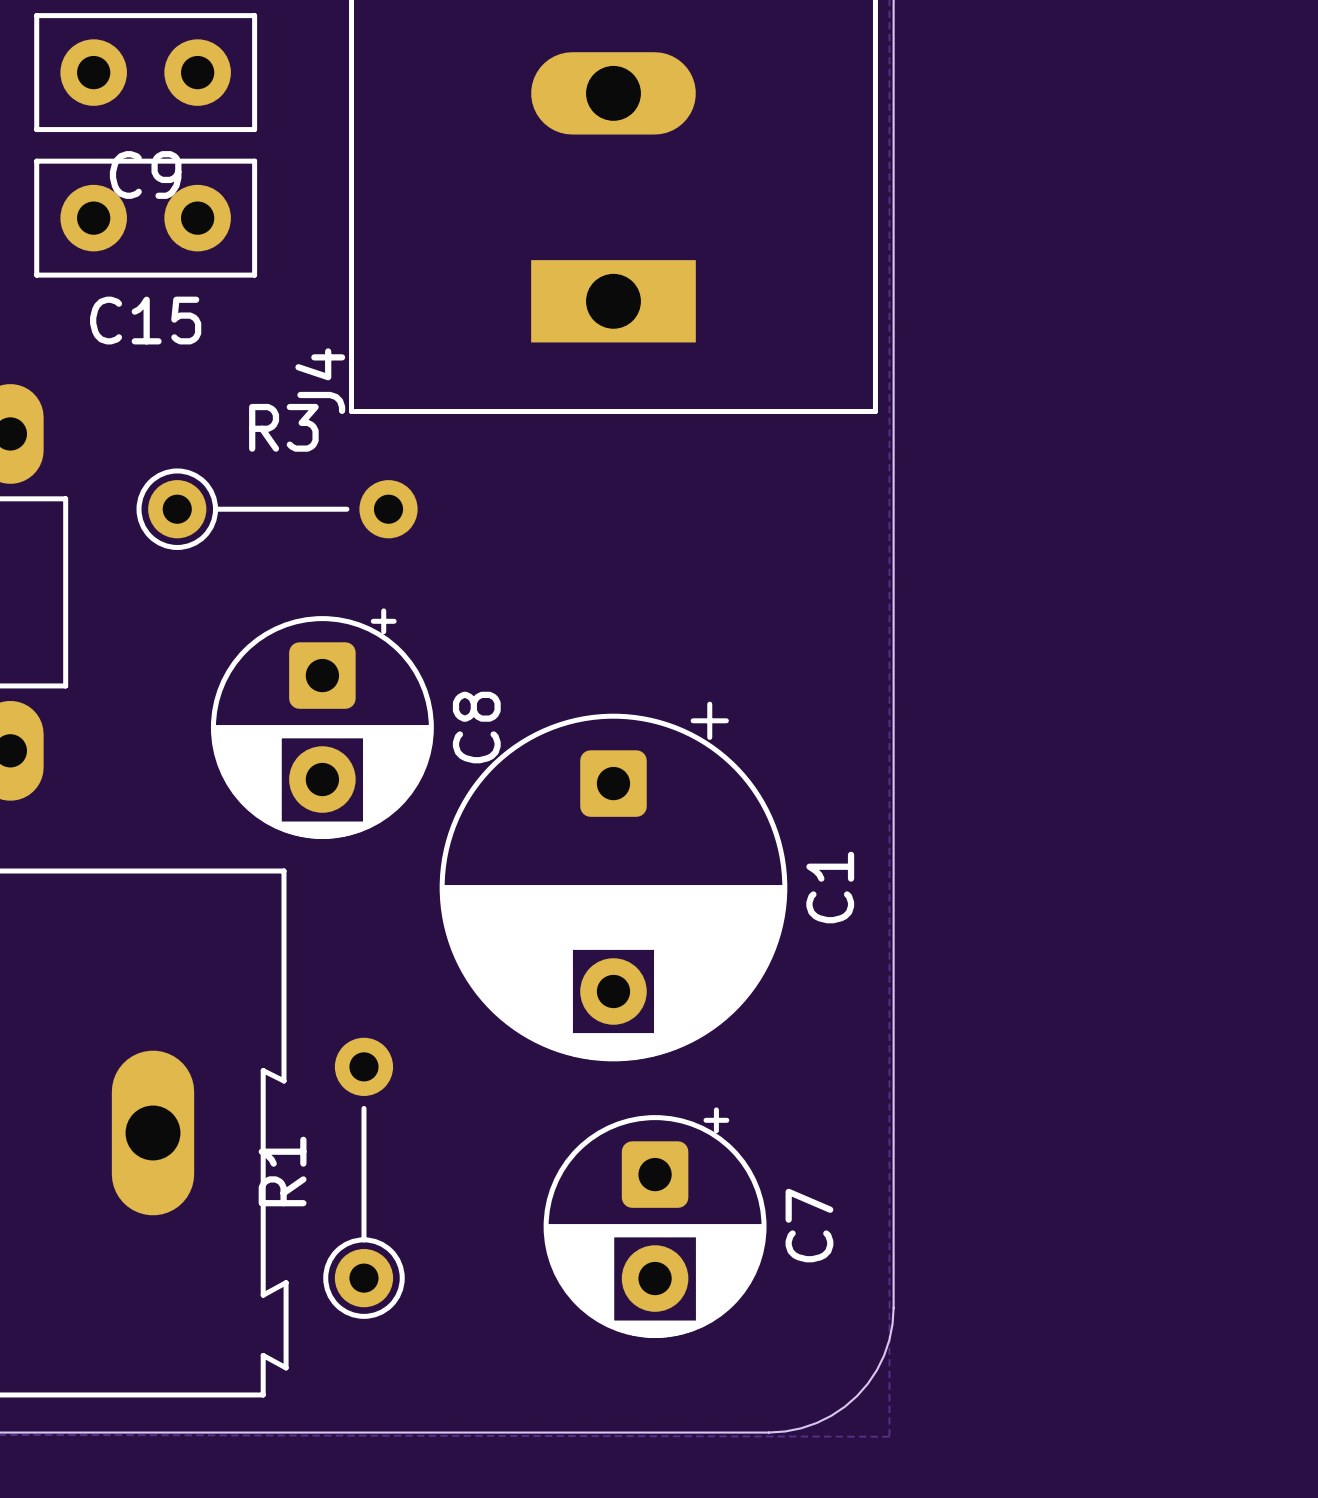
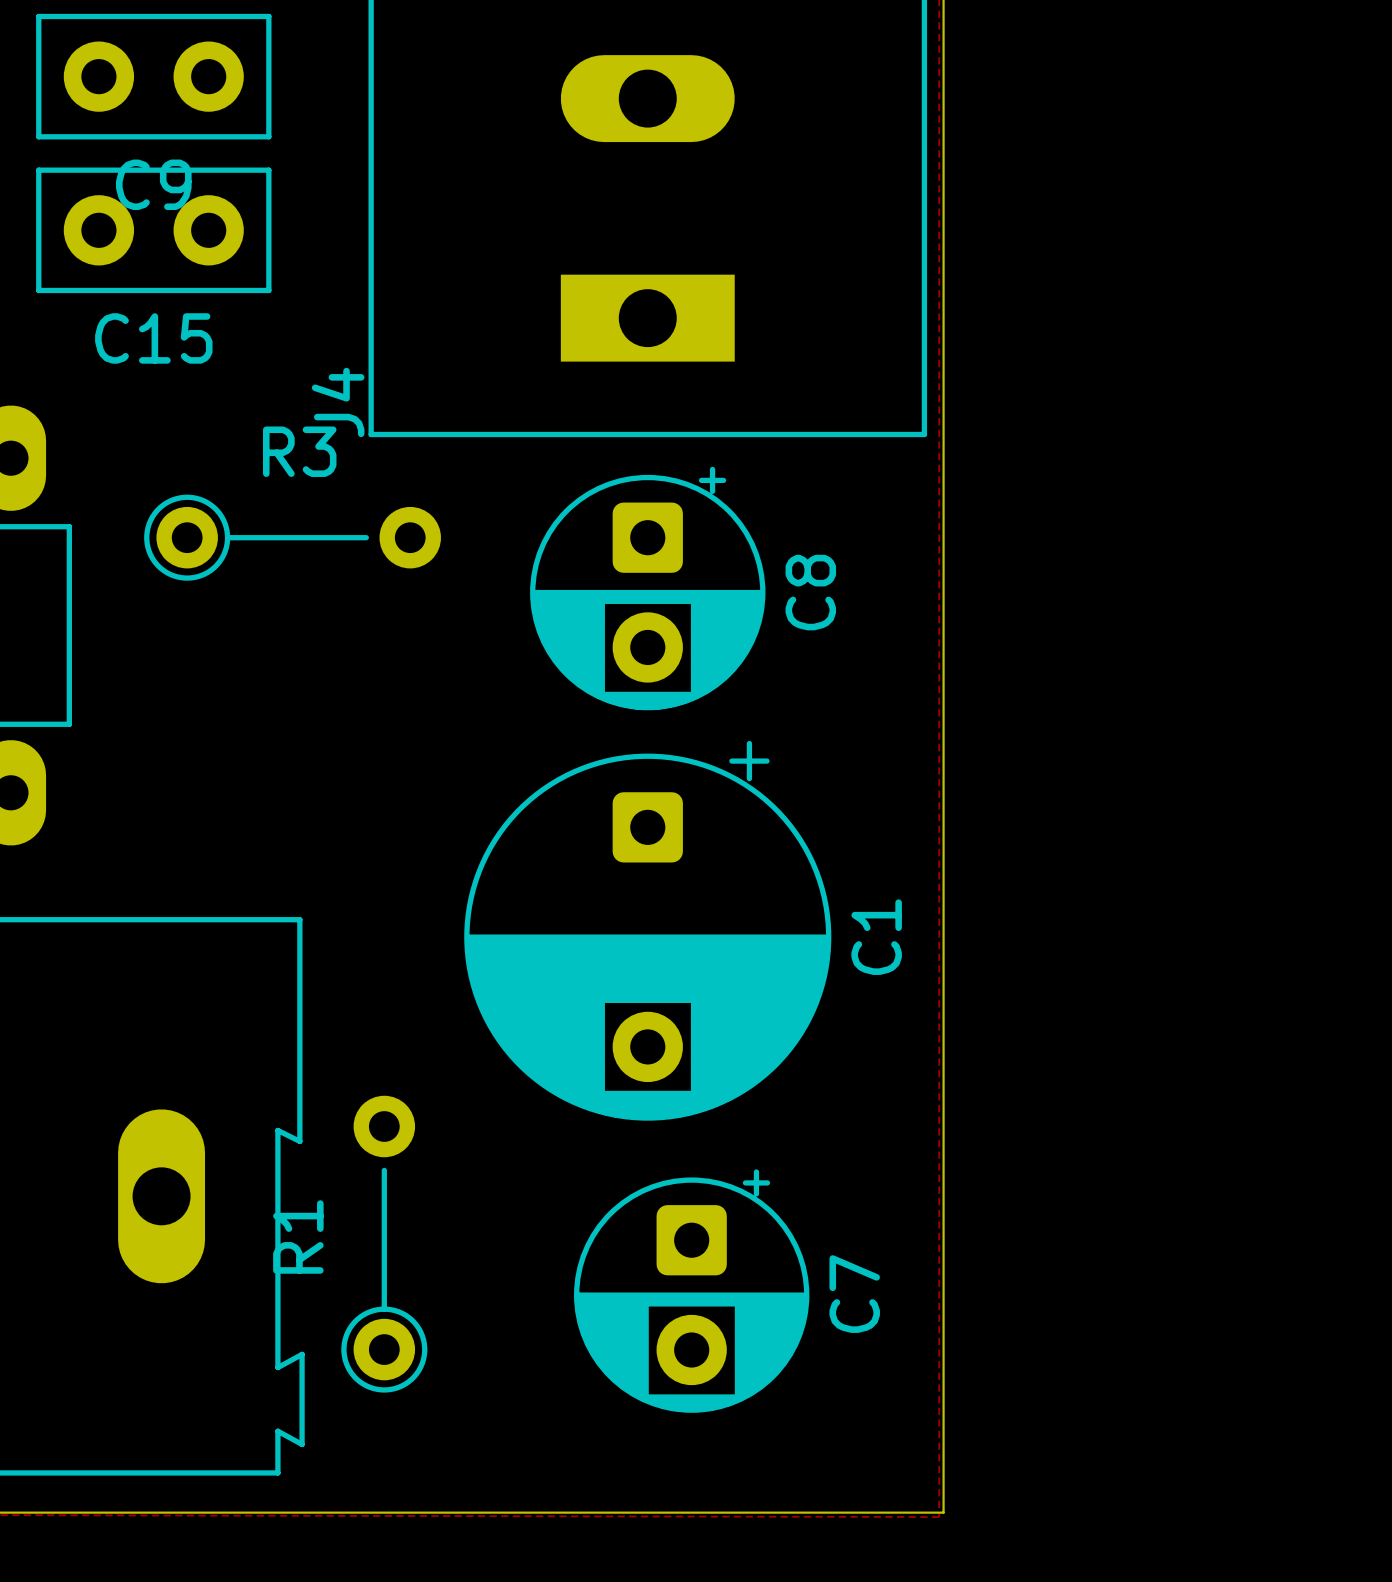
C8 position: (322, 723) -> (647, 588)
board edge: (893, 1307) (892, 1324) (884, 1355) (867, 1383) (857, 1396) (844, 1406) (816, 1423) (801, 1428) (768, 1432) -> (943, 1380) (943, 1512) (811, 1512)

